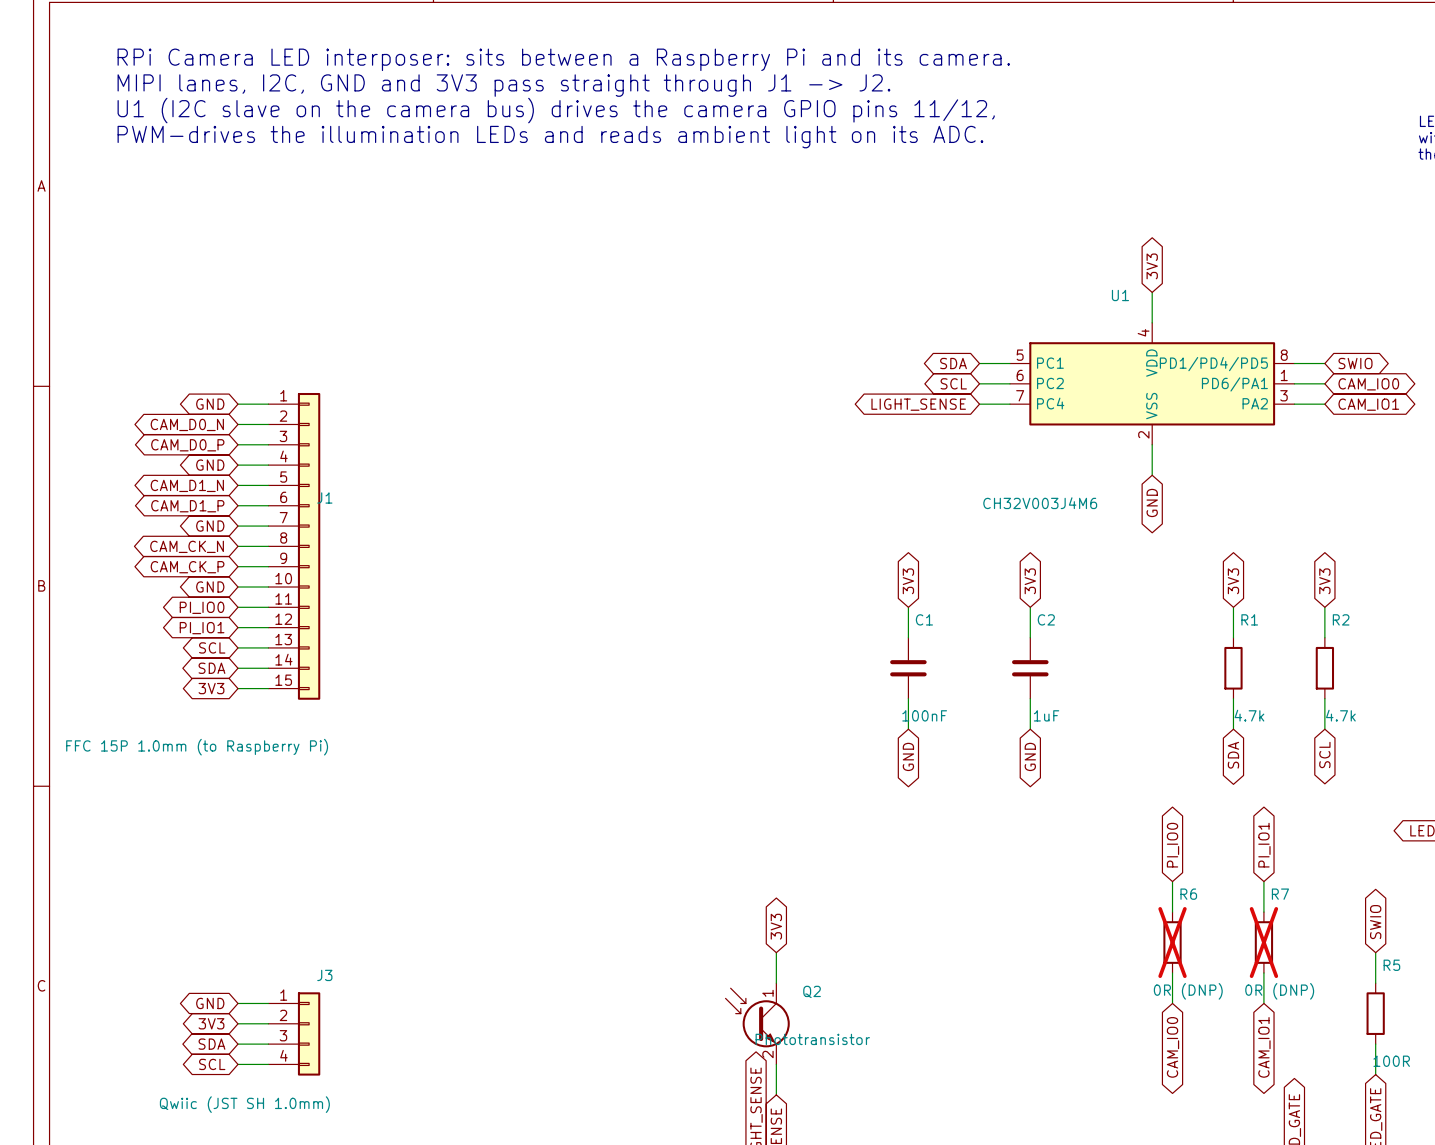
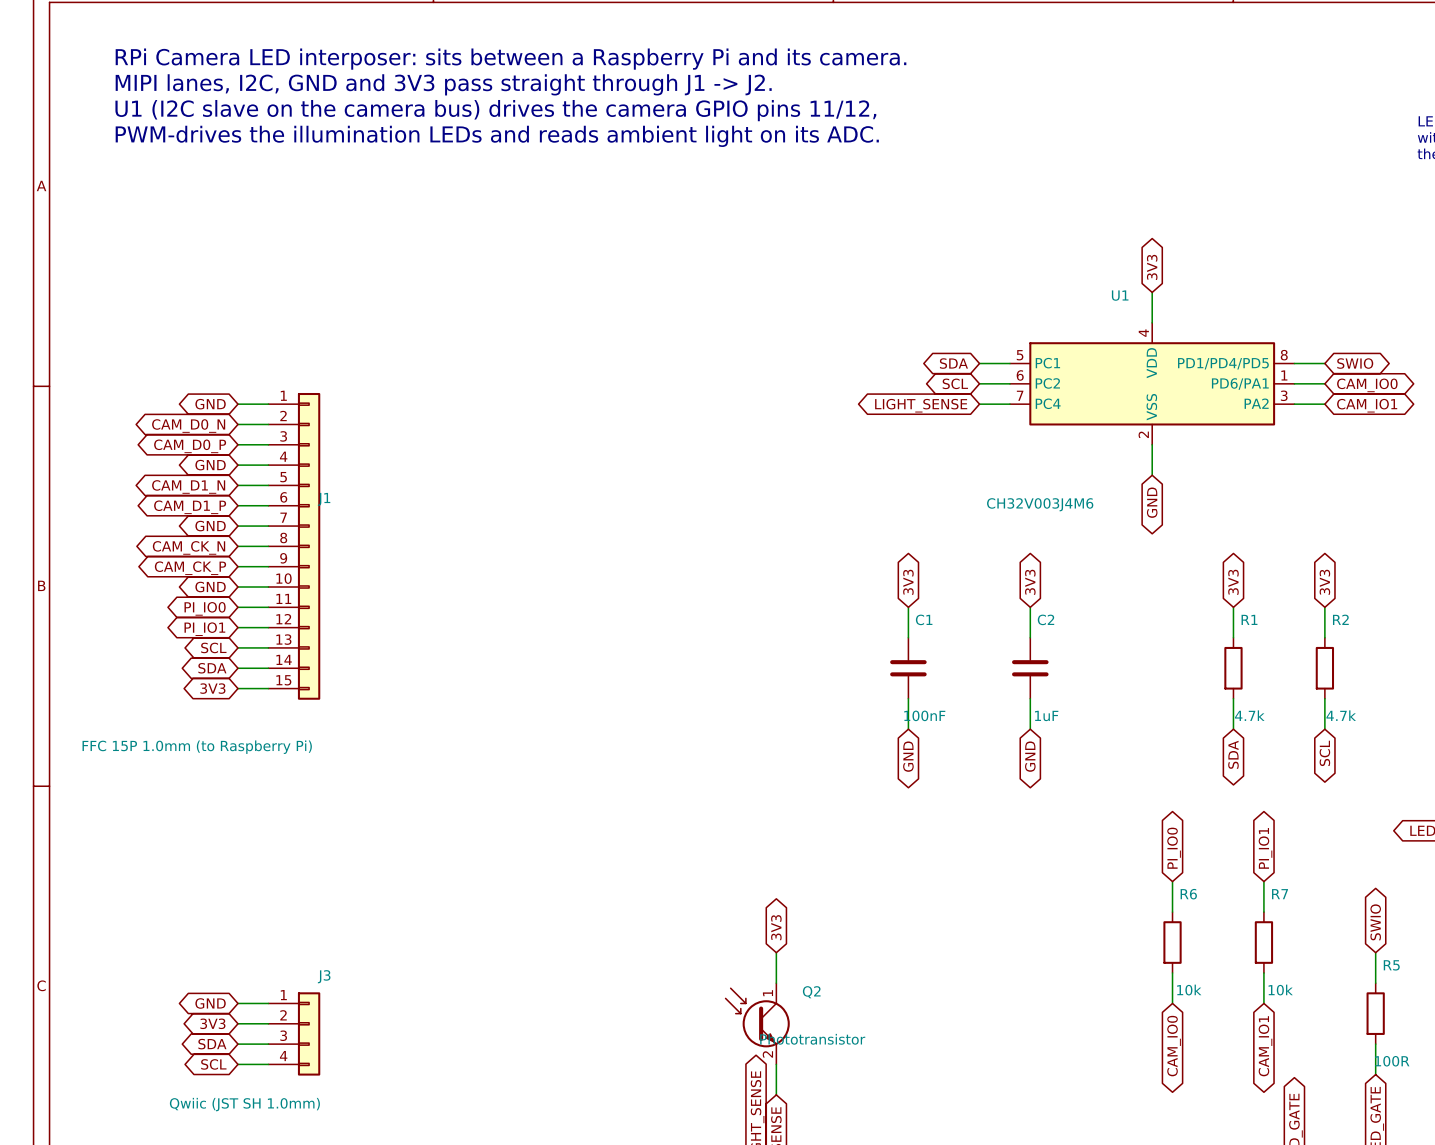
R6 do-not-place cross: (1172, 942) -> none
R7 do-not-place cross: (1263, 942) -> none
R6 value: 0R (DNP) (1188, 991) -> 10k (1189, 990)
R7 value: 0R (DNP) (1279, 991) -> 10k (1280, 990)

